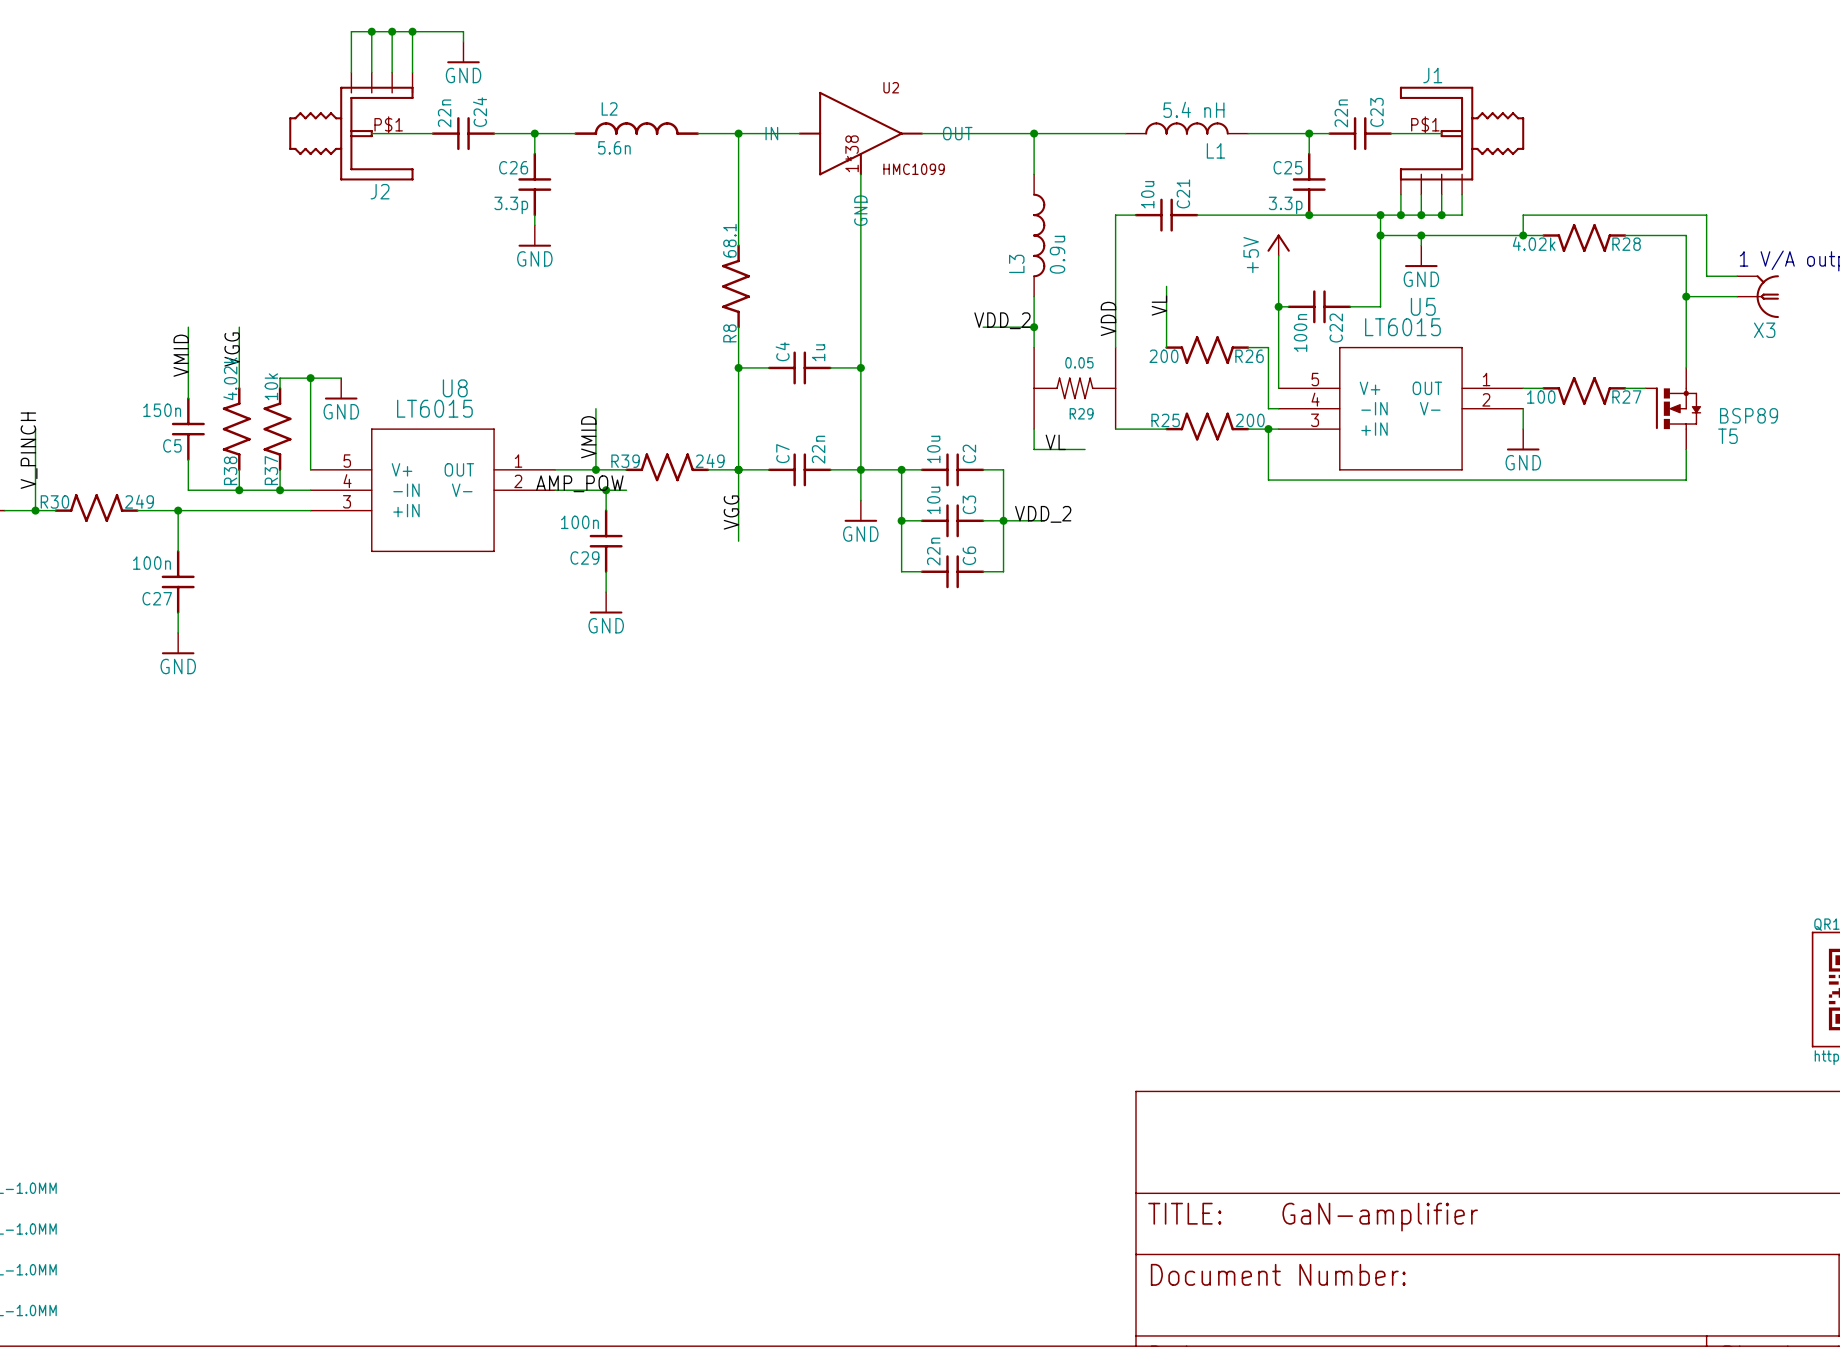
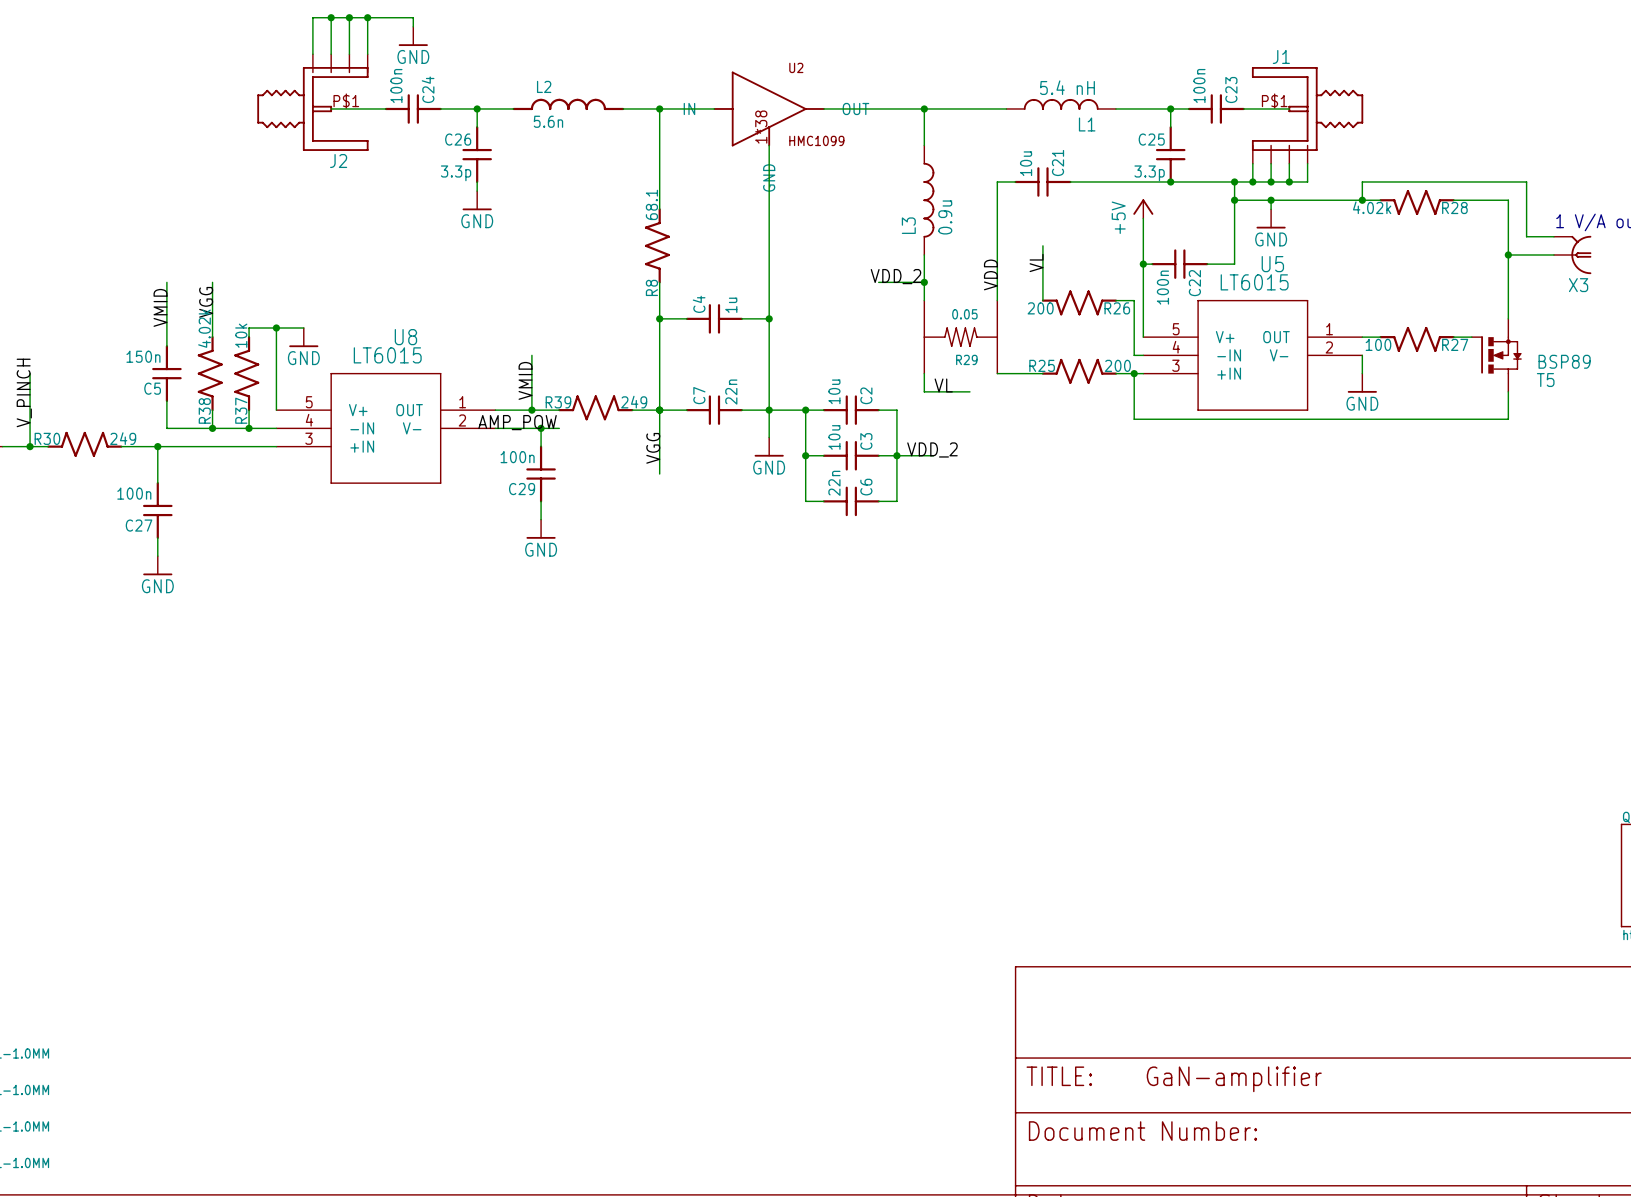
C24 value: 22n (444, 113) -> 100n (396, 86)
C23 value: 22n (1341, 113) -> 100n (1199, 86)

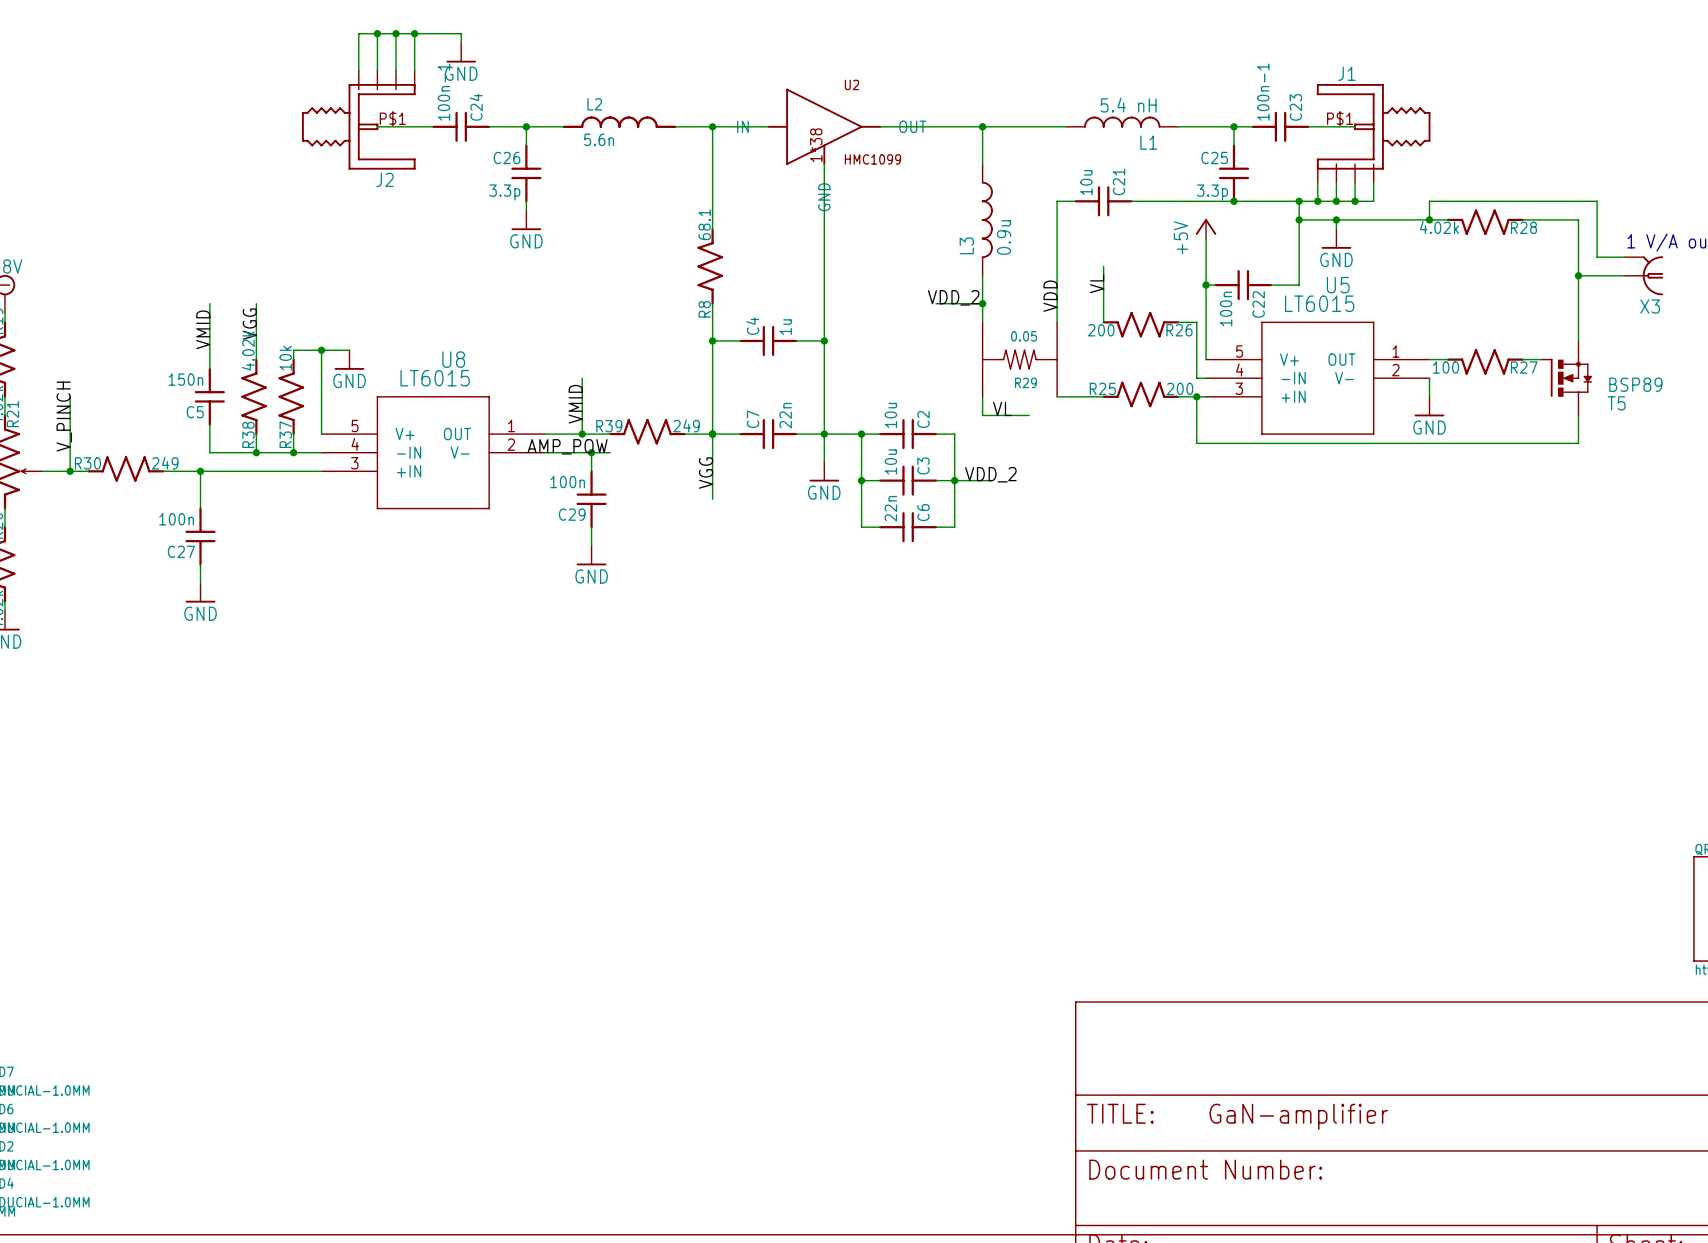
C24 value: 100n (396, 86) -> 100n-1 (443, 92)
C23 value: 100n (1199, 86) -> 100n-1 (1263, 92)

